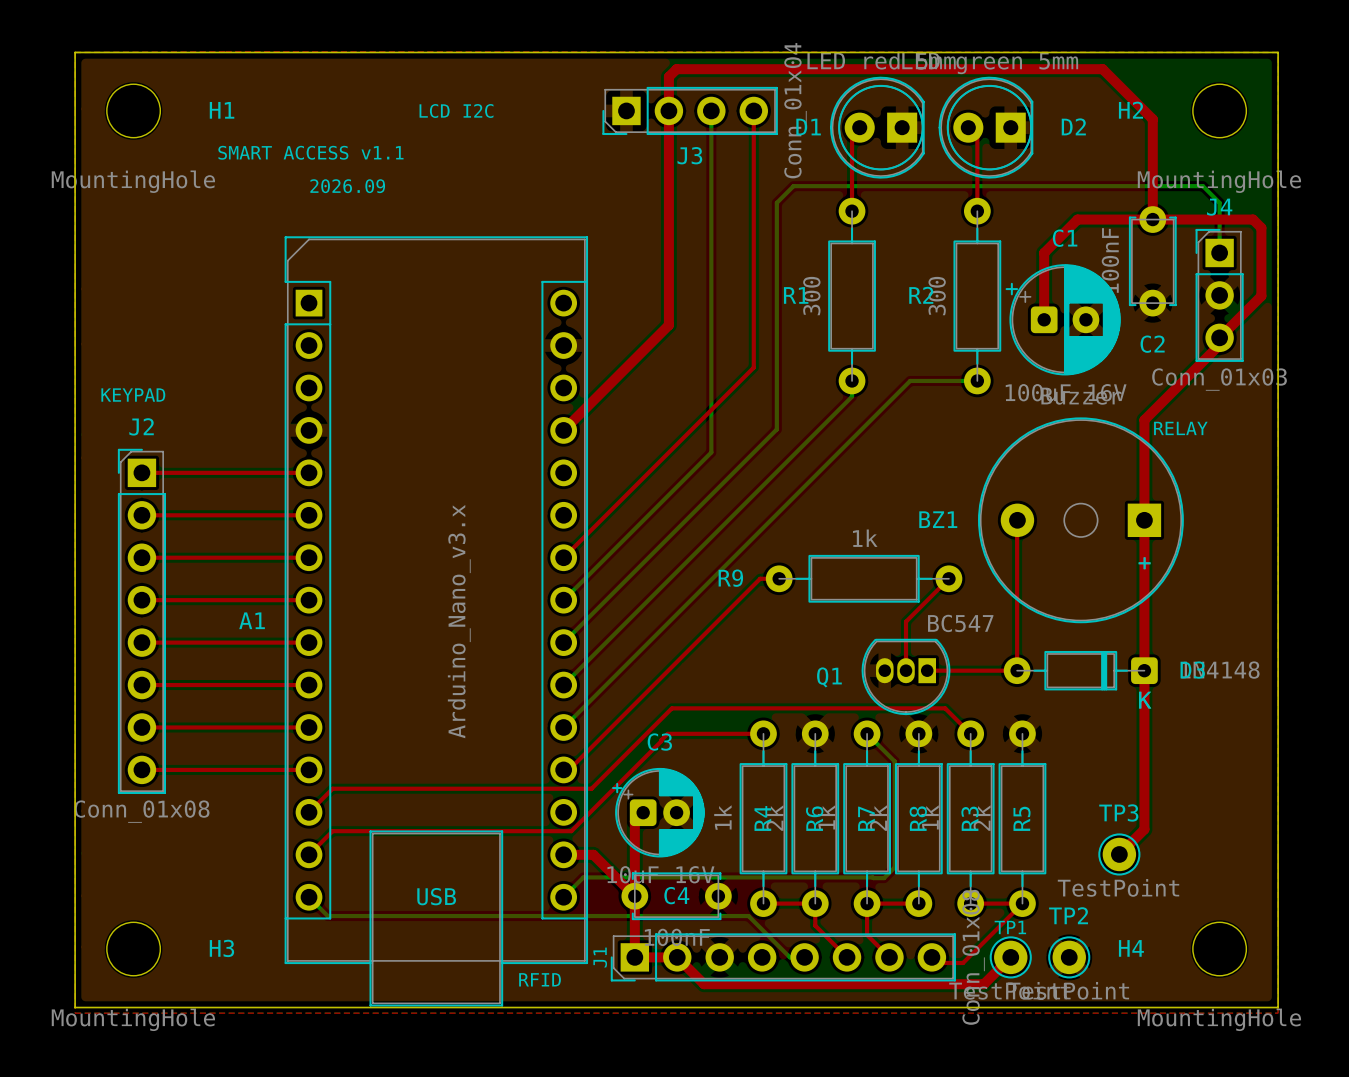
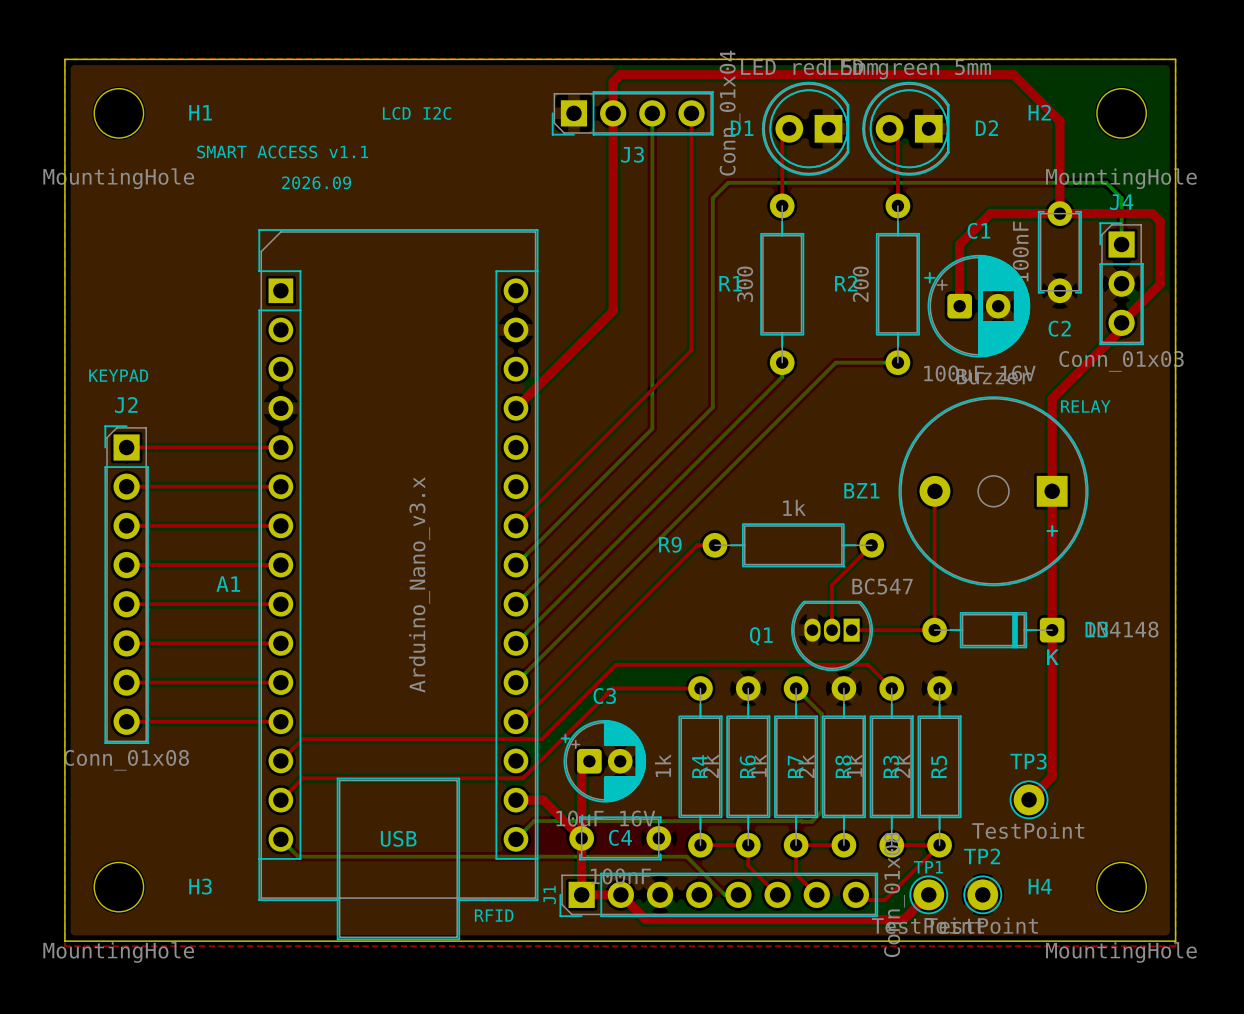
R2 value: 300 (937, 296) -> 200 (860, 284)

